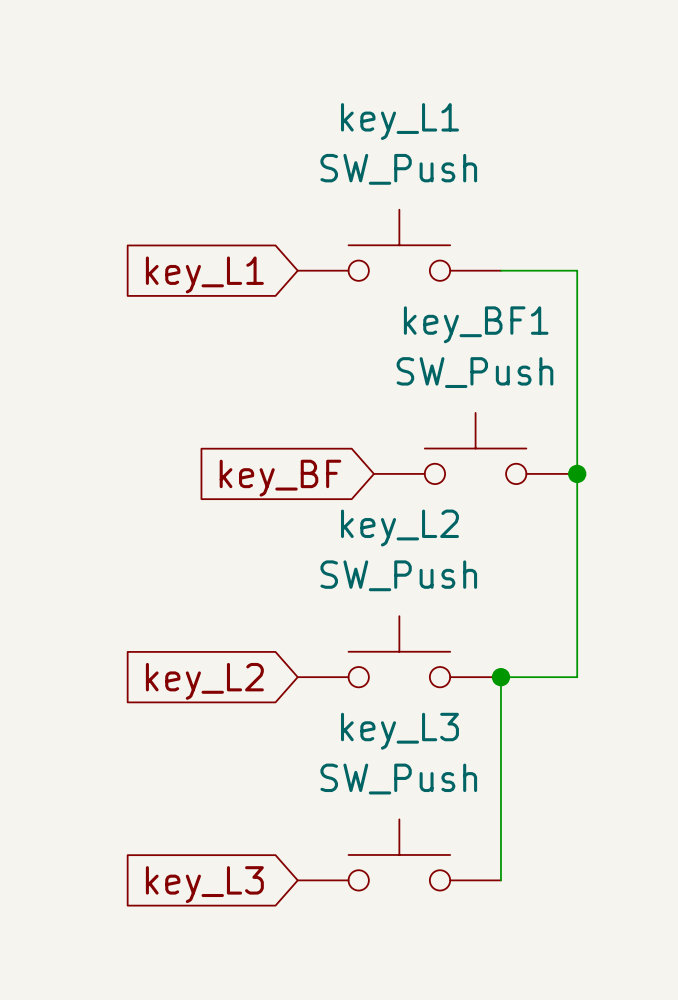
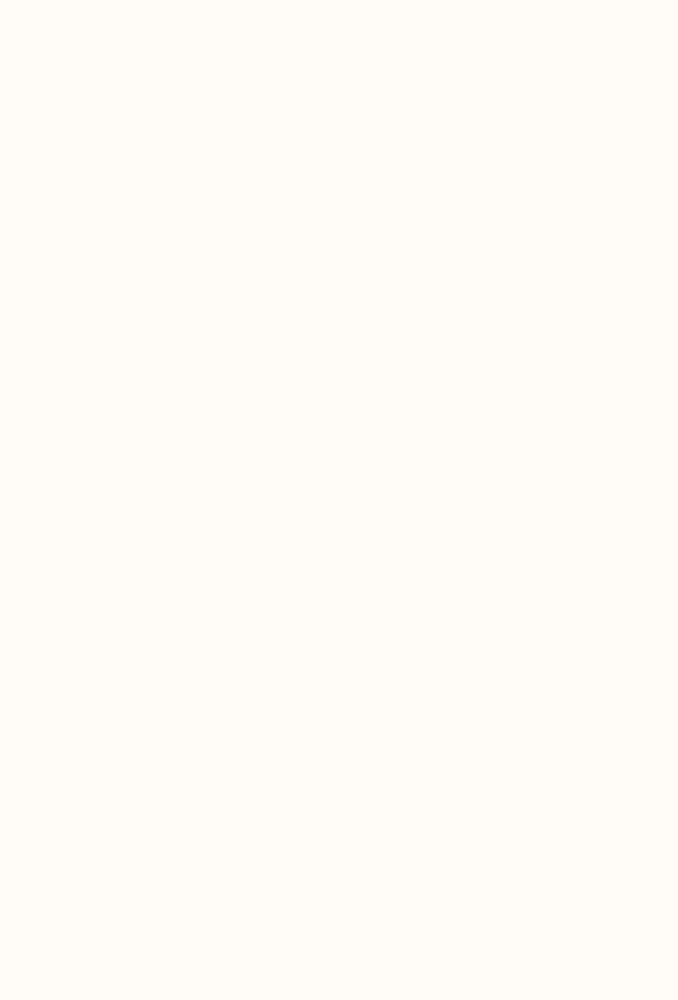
key_L1: SW_Push (399, 245) -> none
wire: (500, 270) (577, 270) (577, 677) (500, 677) (500, 880) -> none
global label: key_L1 (204, 274) -> none
key_BF1: SW_Push (475, 448) -> none
junction: (577, 473) -> none
global label: key_BF (280, 478) -> none
key_L2: SW_Push (399, 651) -> none
junction: (500, 677) -> none
global label: key_L2 (204, 681) -> none
key_L3: SW_Push (399, 854) -> none
global label: key_L3 (204, 884) -> none

